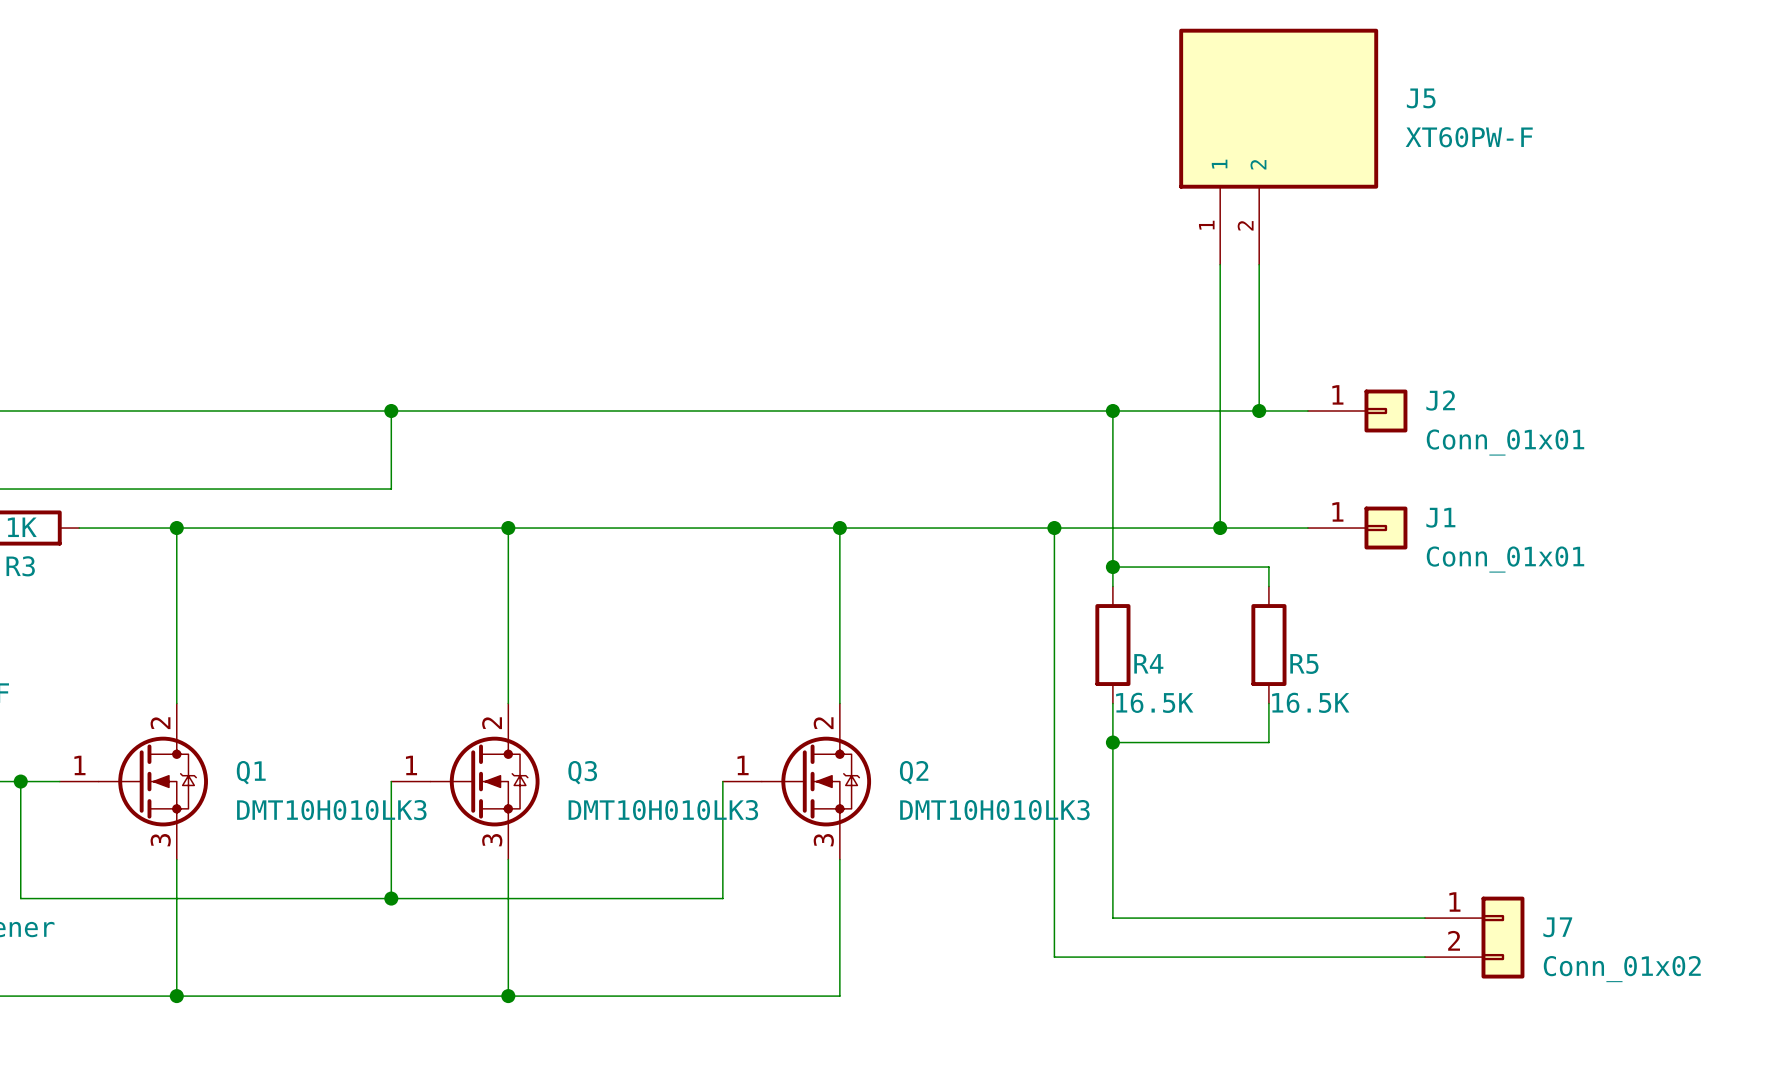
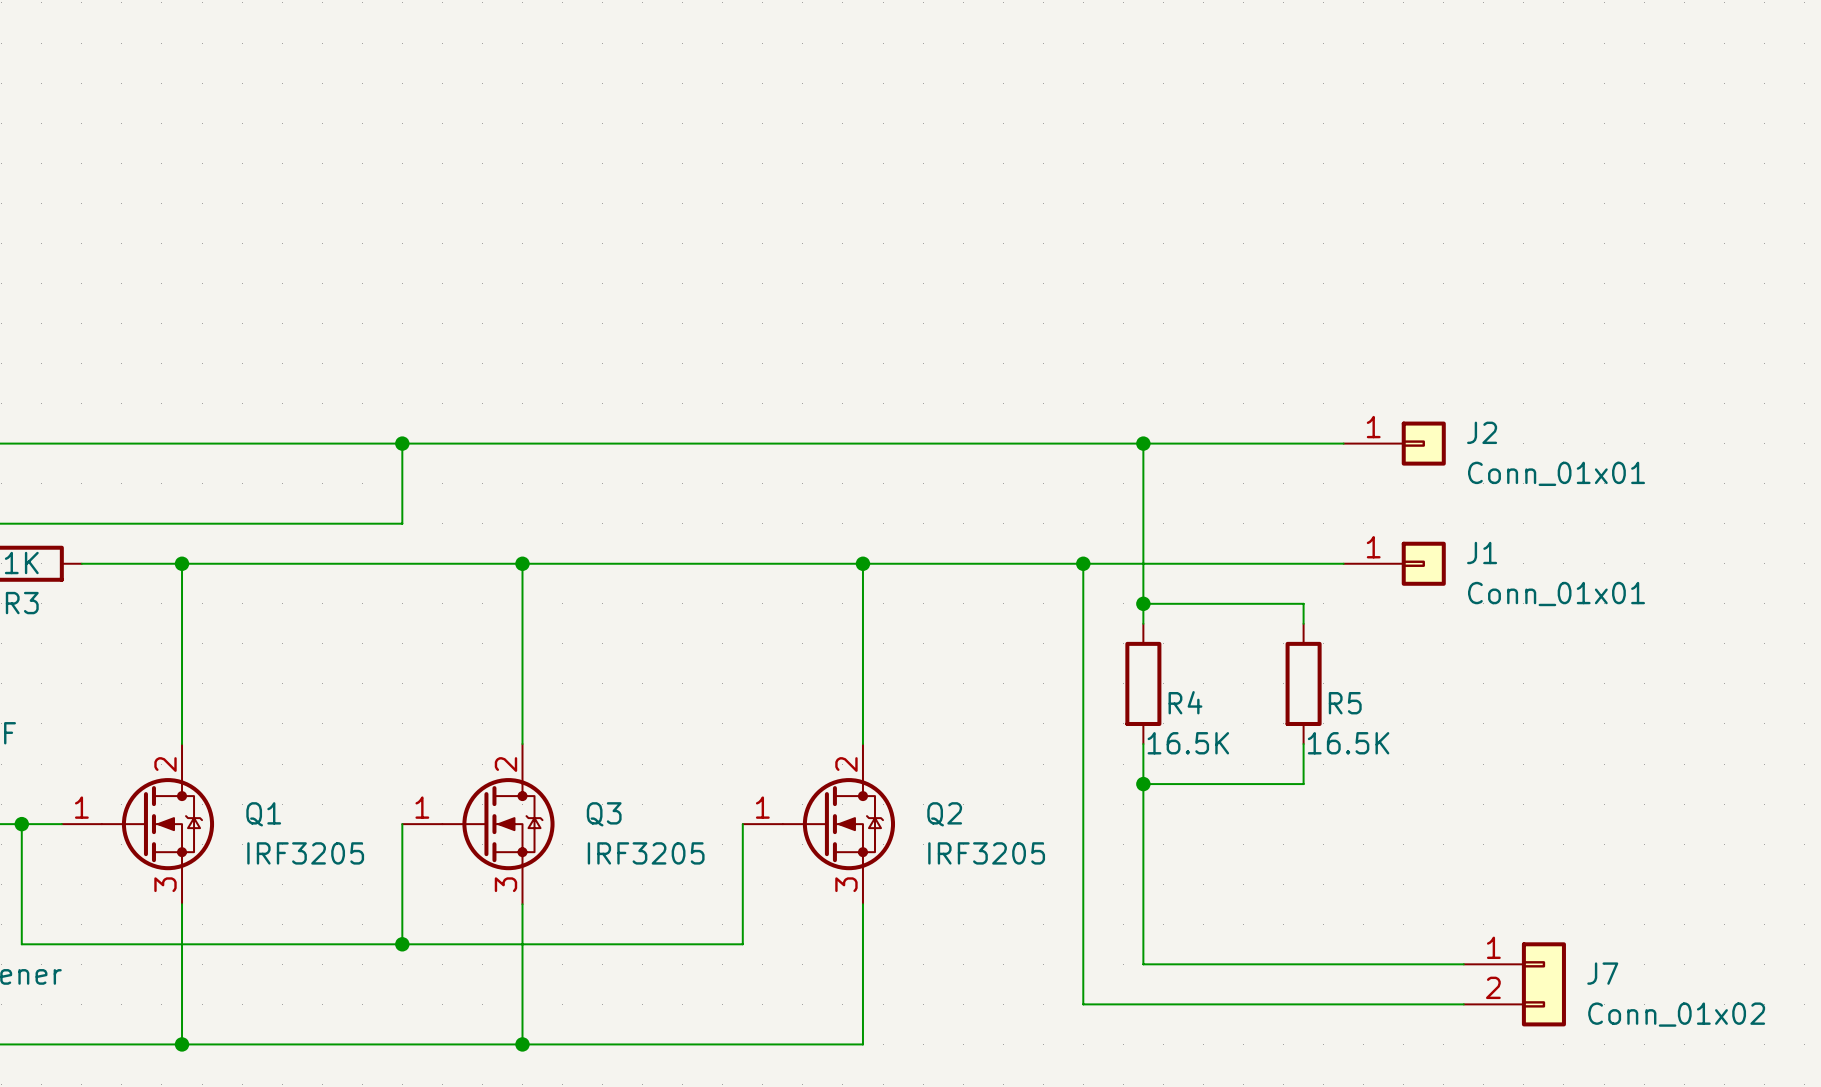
J5: XT60PW-F (1278, 146) -> none
wire: (1220, 264) (1220, 528) -> none
wire: (1259, 264) (1259, 411) -> none
junction: (1259, 411) -> none
junction: (1220, 528) -> none
Q1 value: DMT10H010LK3 (331, 810) -> IRF3205 (305, 853)
Q3 value: DMT10H010LK3 (663, 810) -> IRF3205 (646, 853)
Q2 value: DMT10H010LK3 (994, 810) -> IRF3205 (986, 853)

